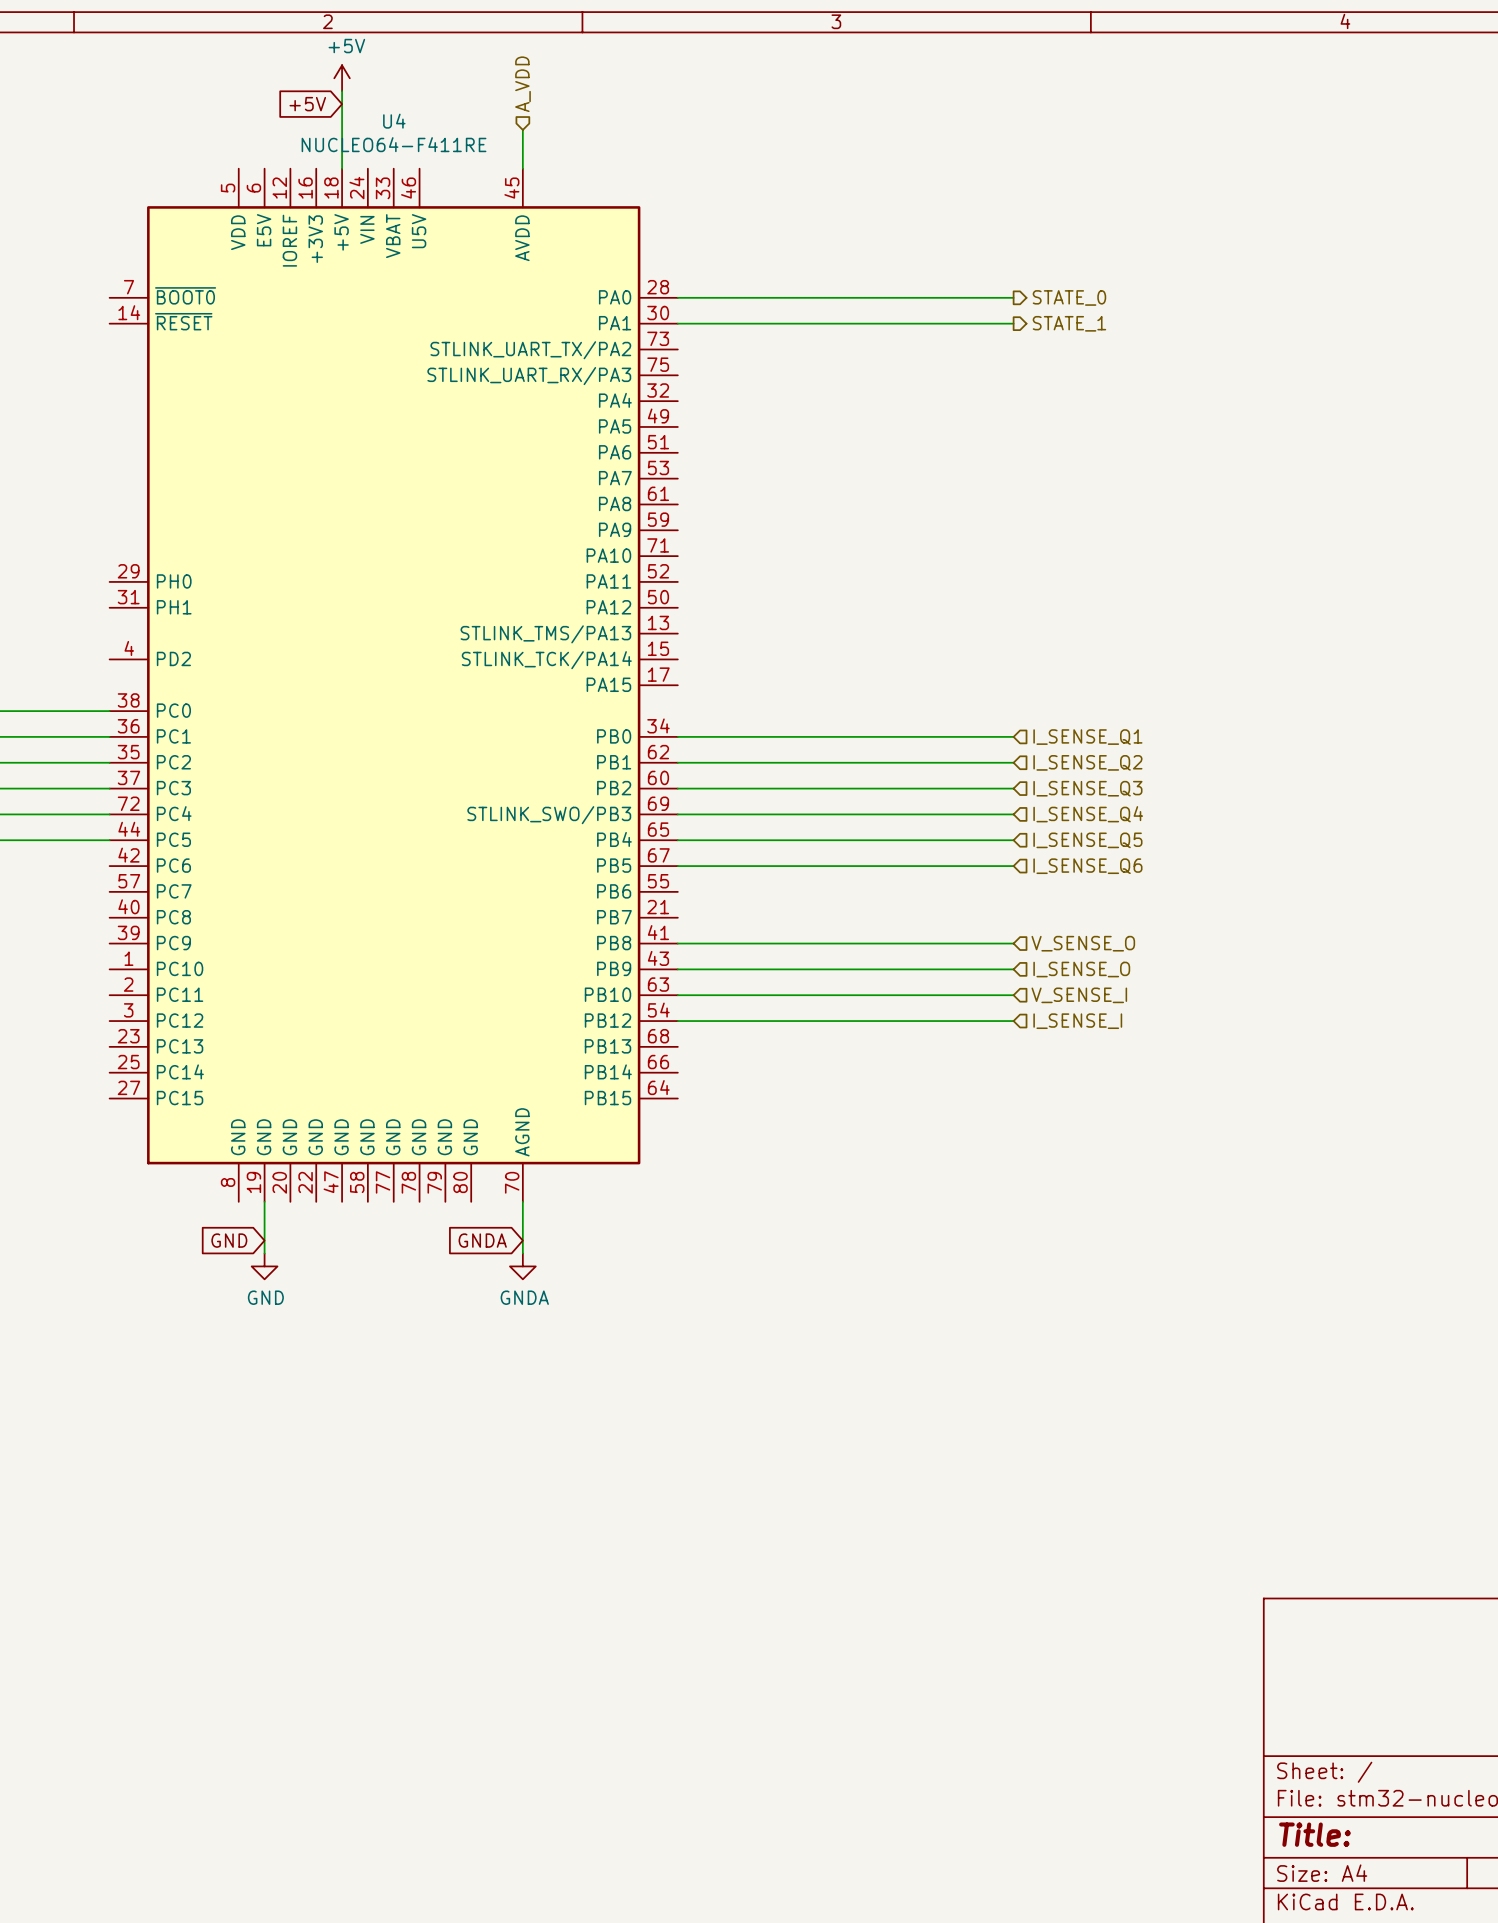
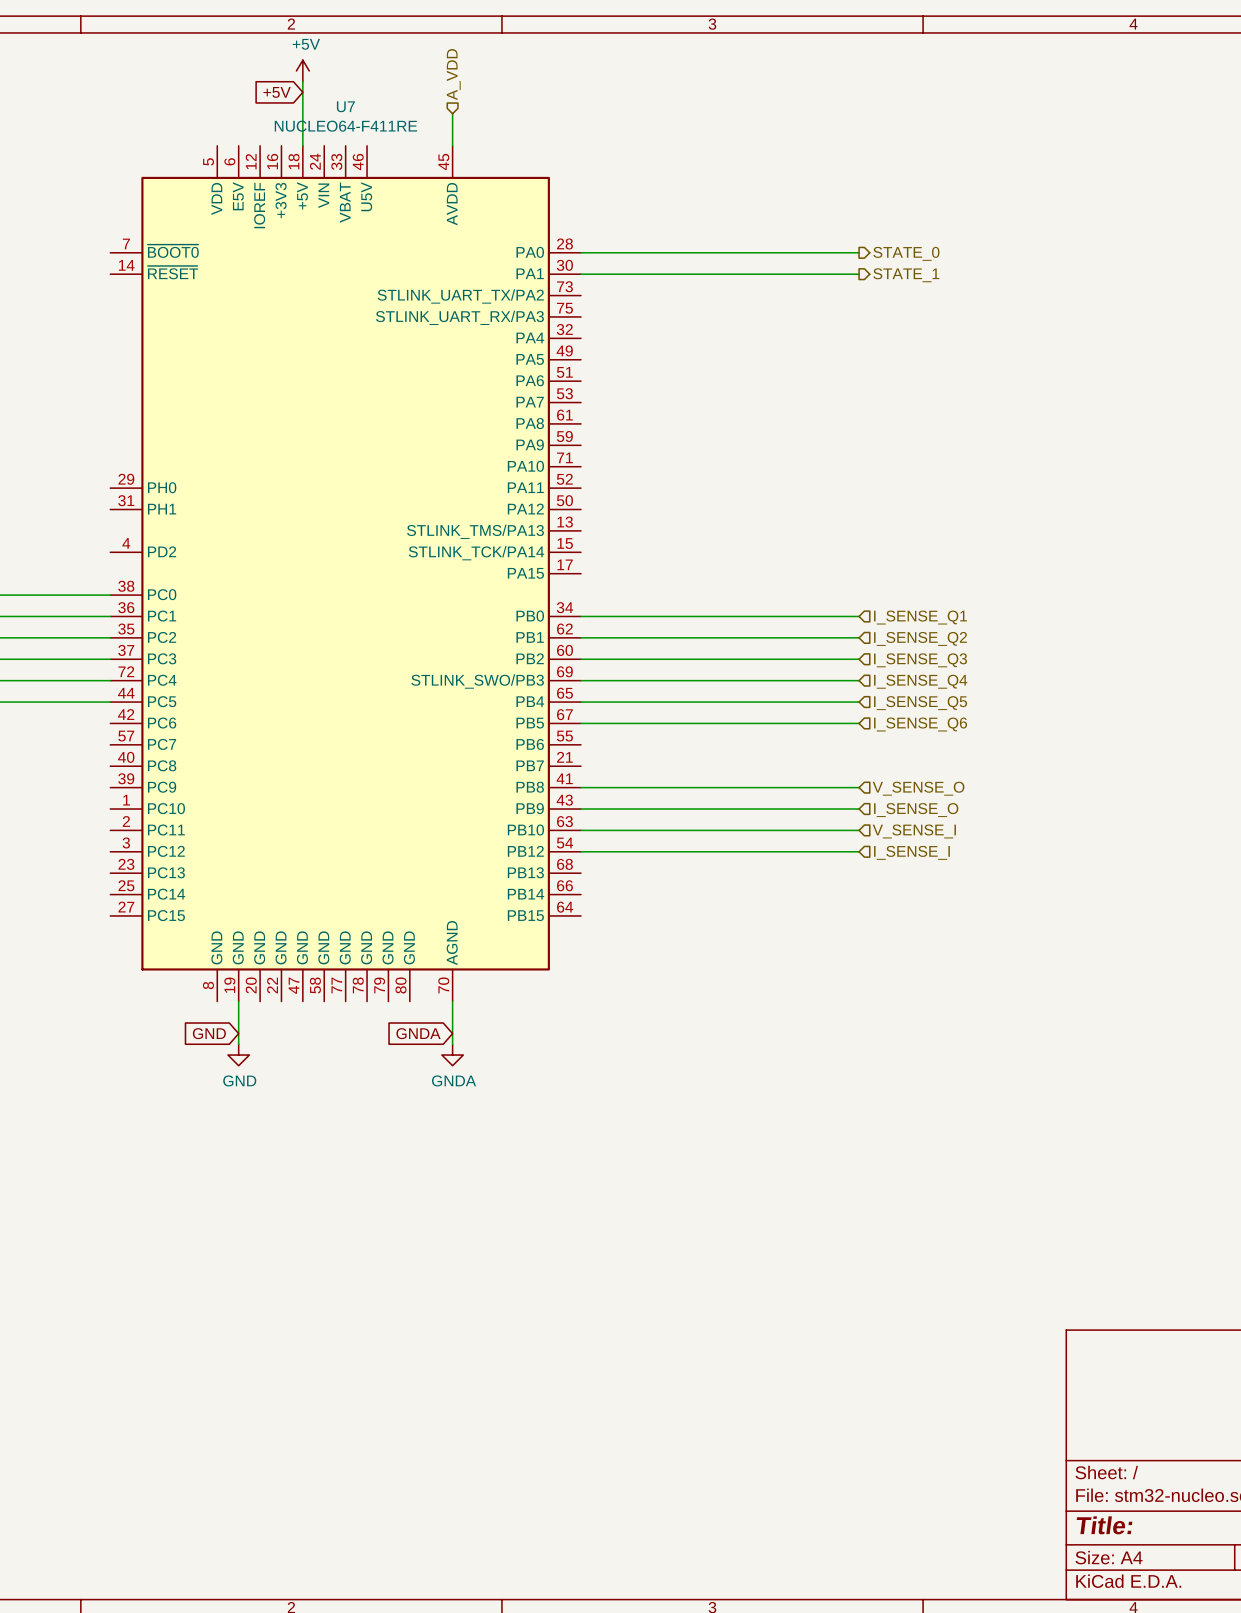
U4 name: U4 (394, 121) -> U7 (345, 106)

